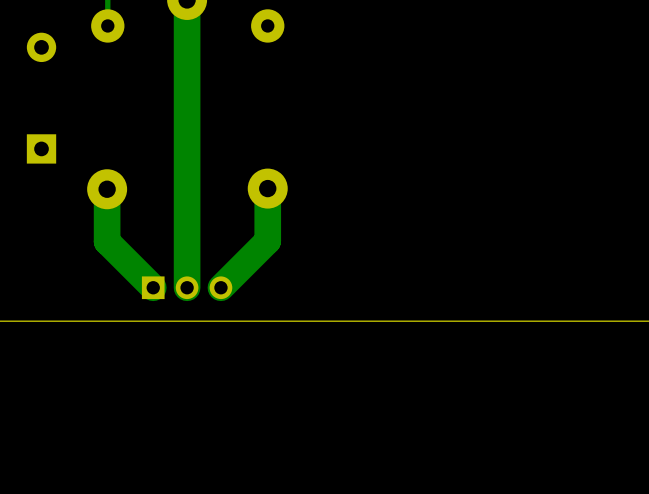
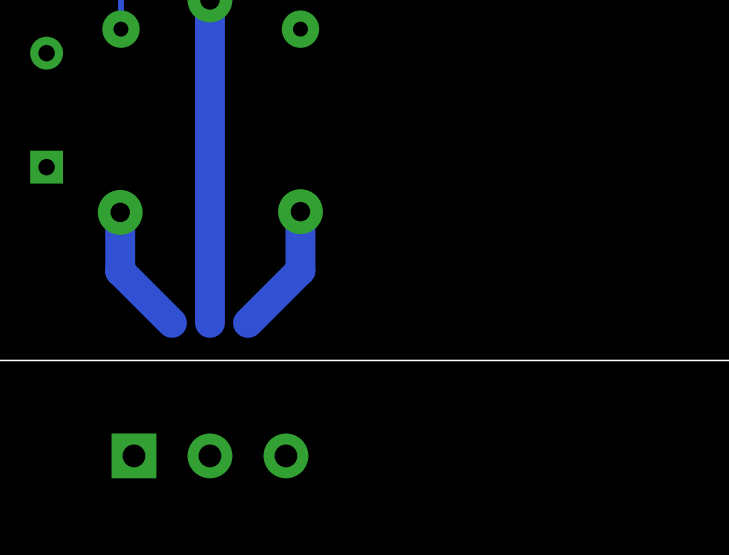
part: (187, 287) -> none
part: none -> (209, 455)

